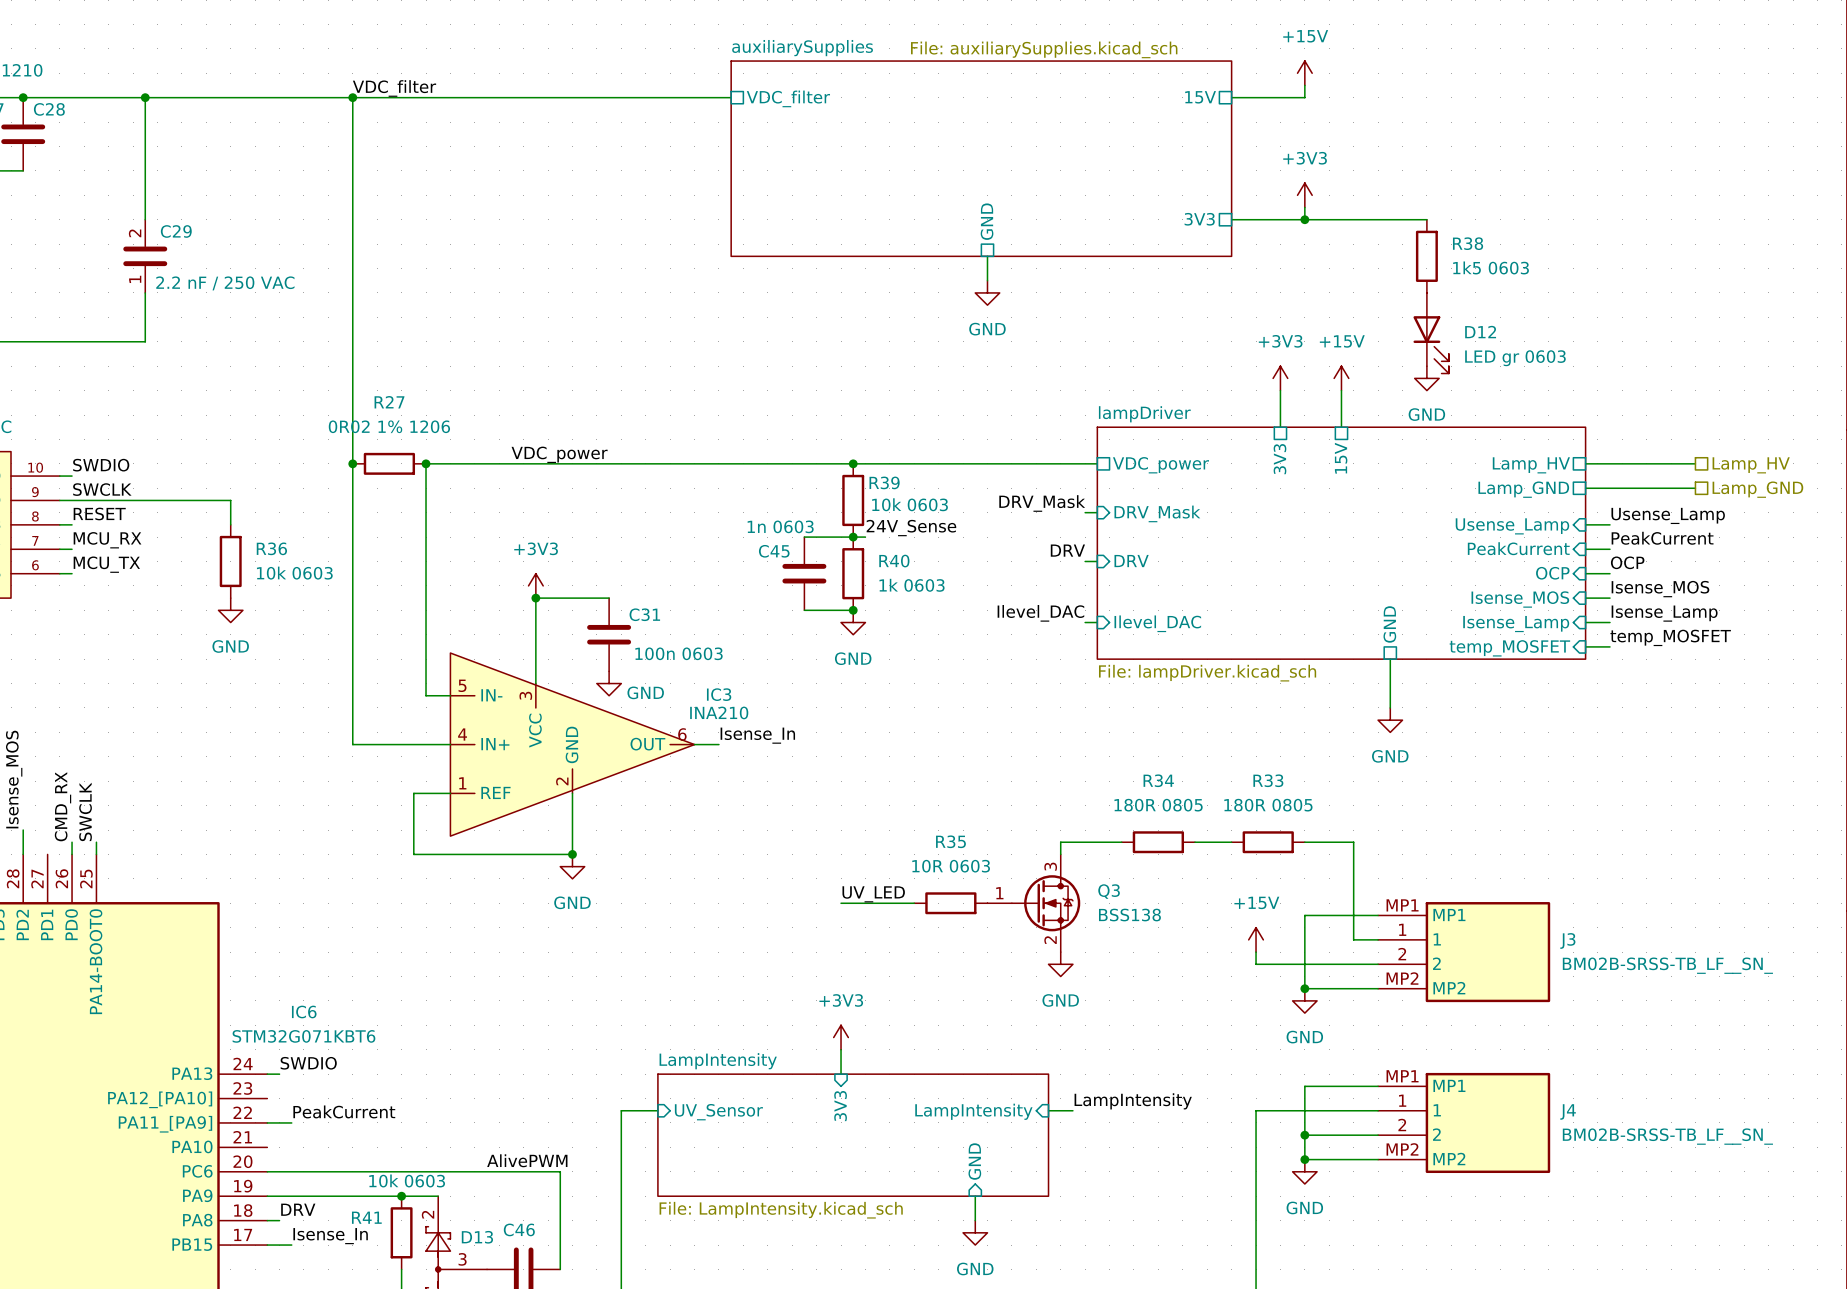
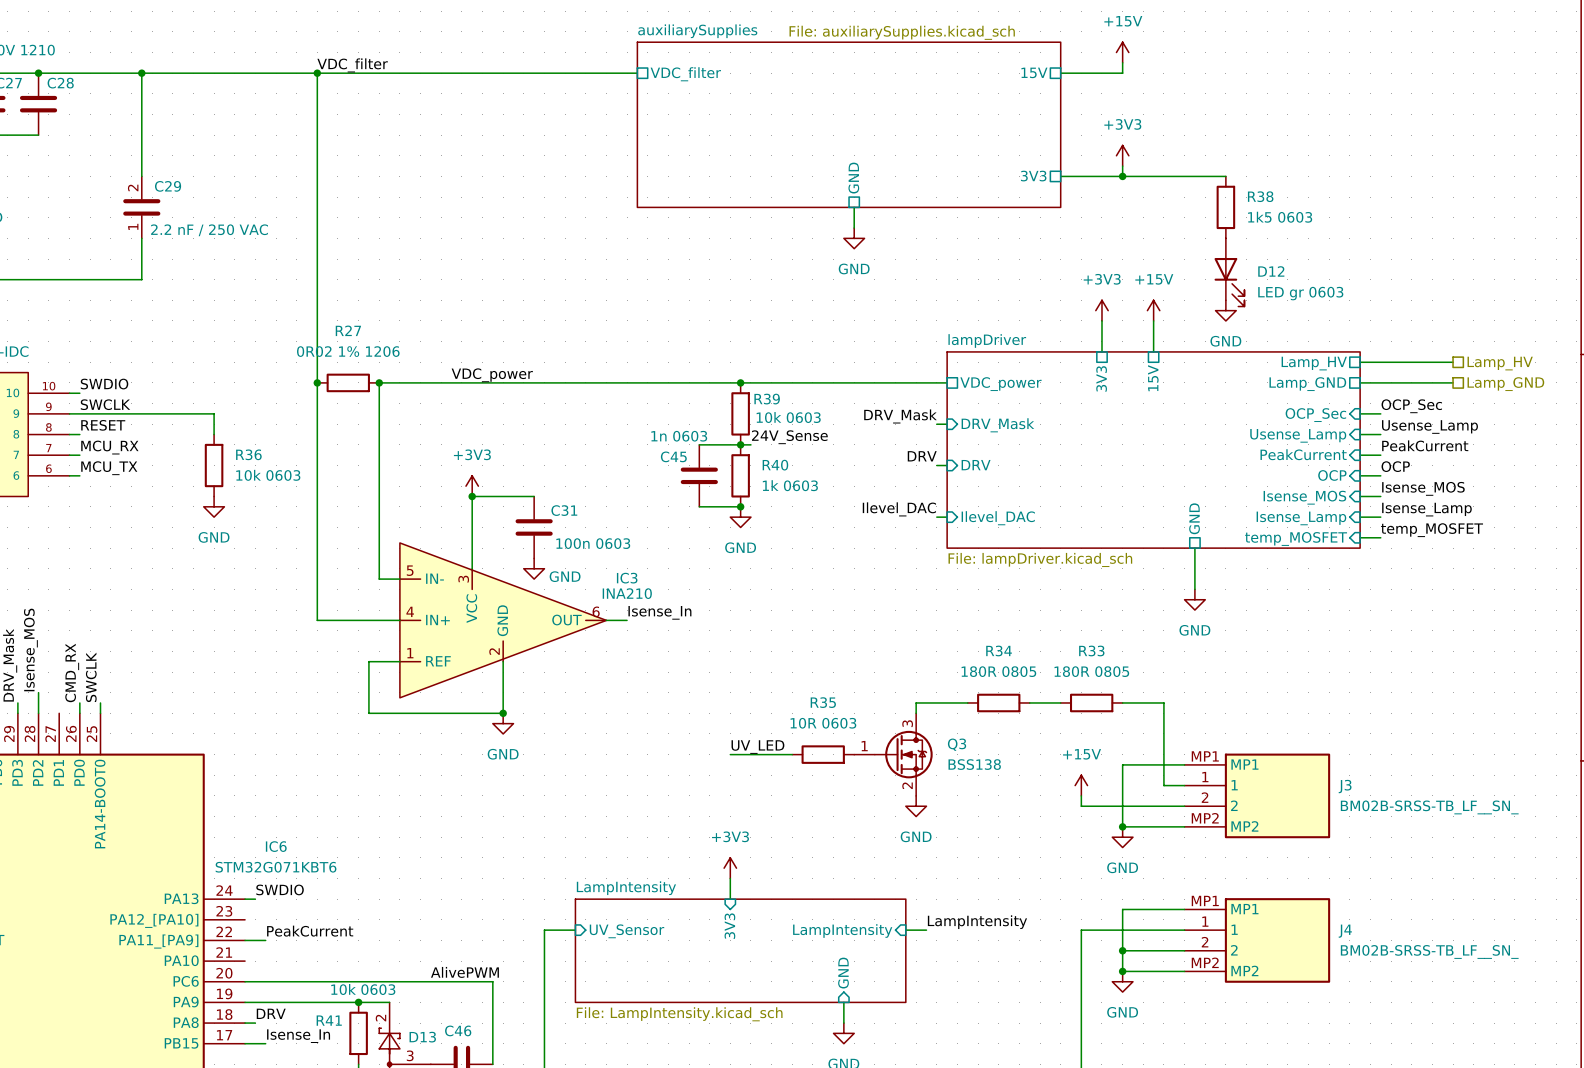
sheet pin: none -> Lamp_HV (1314, 363)
hierarchical label: none -> Lamp_HV (1500, 363)
sheet pin: Lamp_HV (1531, 465) -> Lamp_GND (1307, 384)
hierarchical label: Lamp_HV (1751, 465) -> Lamp_GND (1505, 384)
wire: (1585, 488) (1695, 488) -> (1360, 362) (1453, 362)
sheet pin: Lamp_GND (1523, 489) -> none
hierarchical label: Lamp_GND (1757, 489) -> none
label: none -> OCP_Sec (1411, 406)
wire: none -> (1360, 413) (1380, 413)
sheet pin: none -> OCP_Sec (1315, 415)

